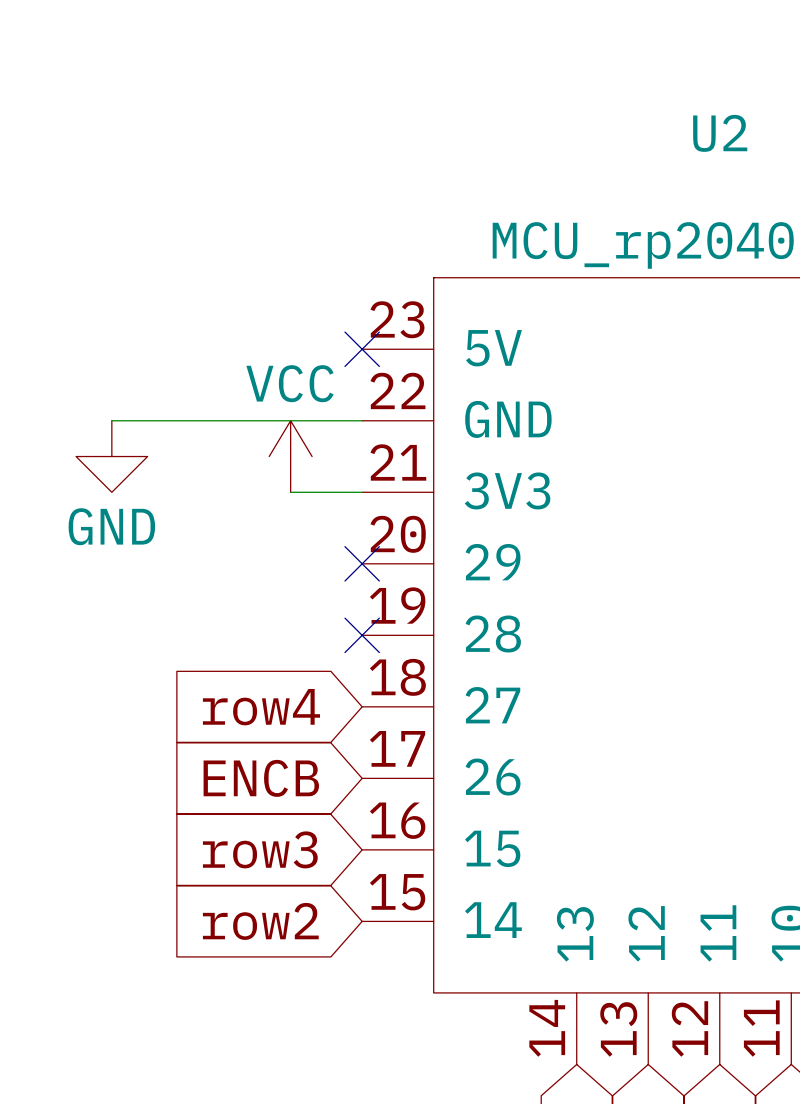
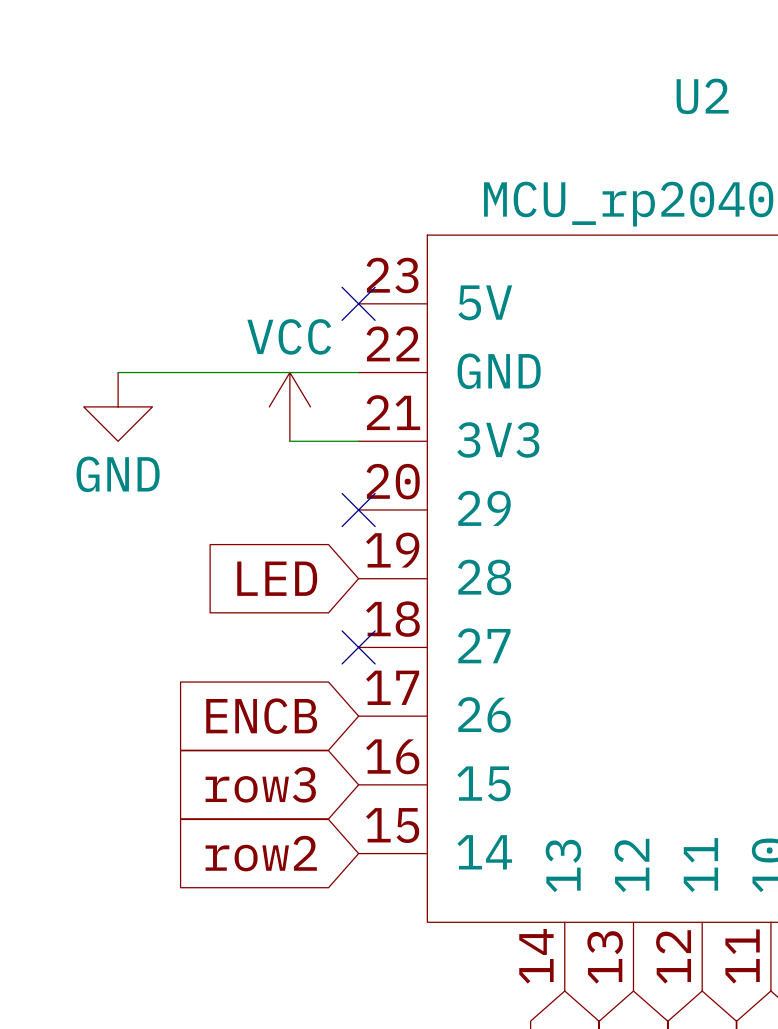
global label: none -> LED (277, 578)
no-connect mark position: (362, 635) -> (358, 647)
global label: row4 (261, 707) -> none

